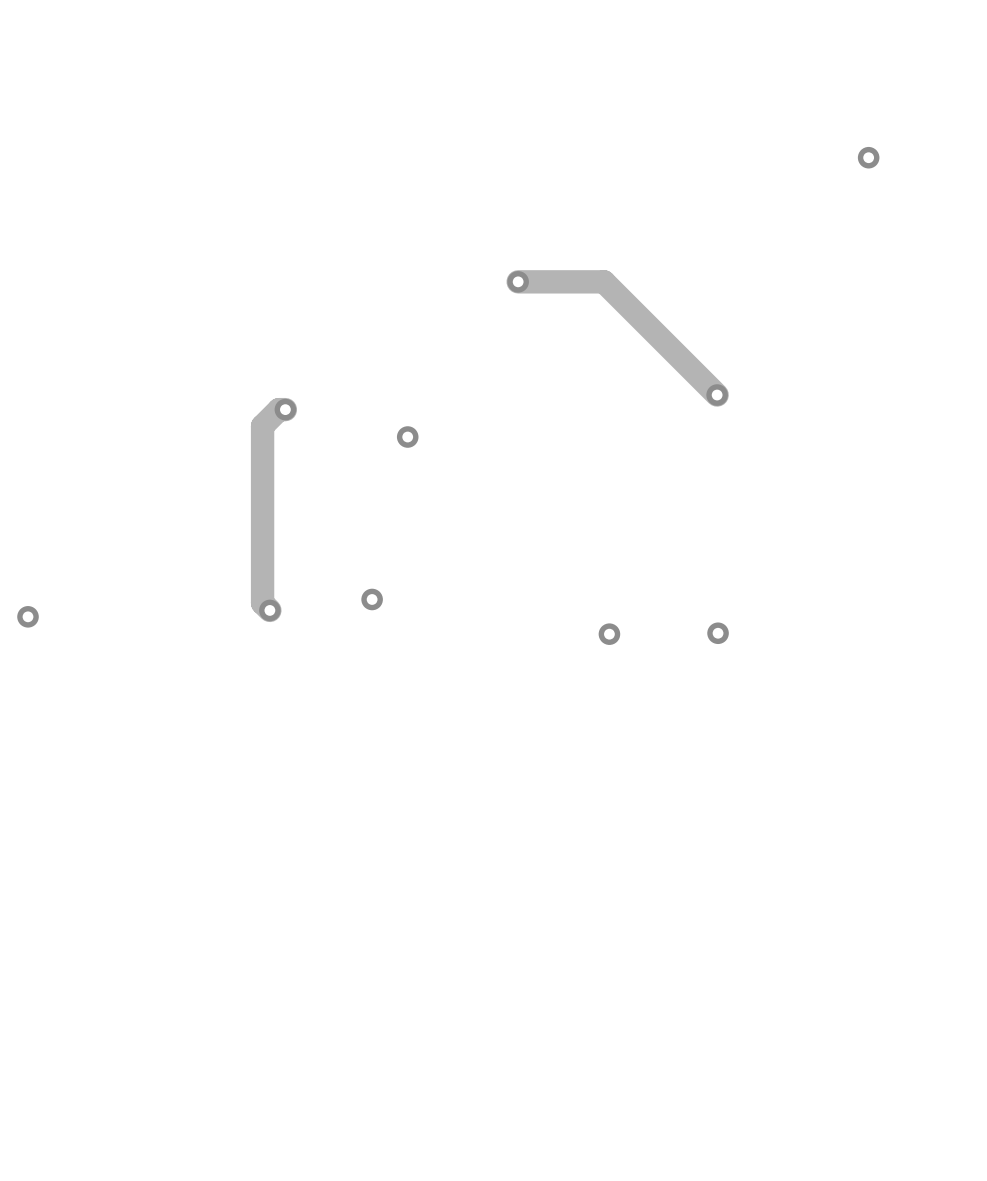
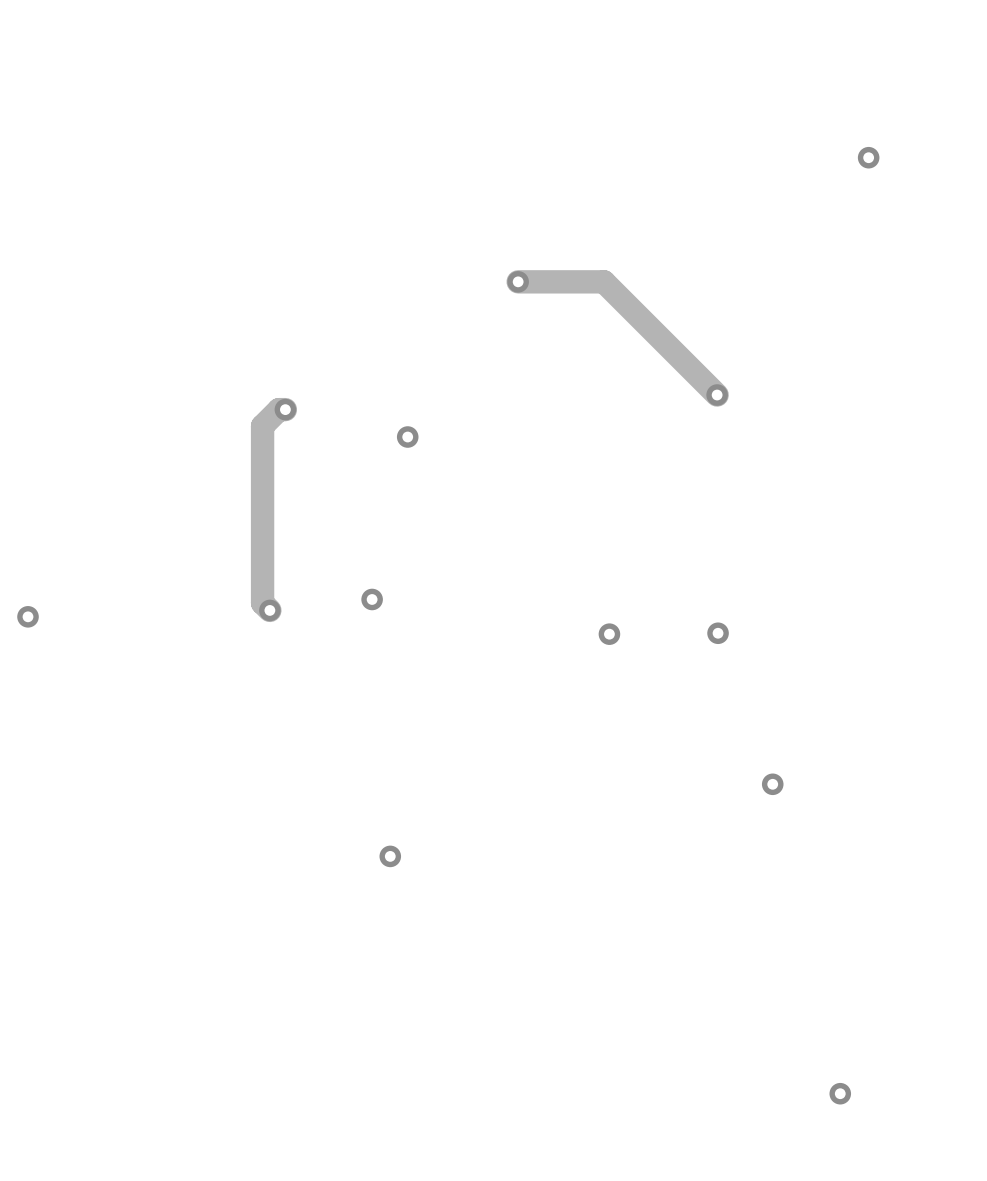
via: none -> (772, 784)
via: none -> (390, 856)
via: none -> (840, 1093)

